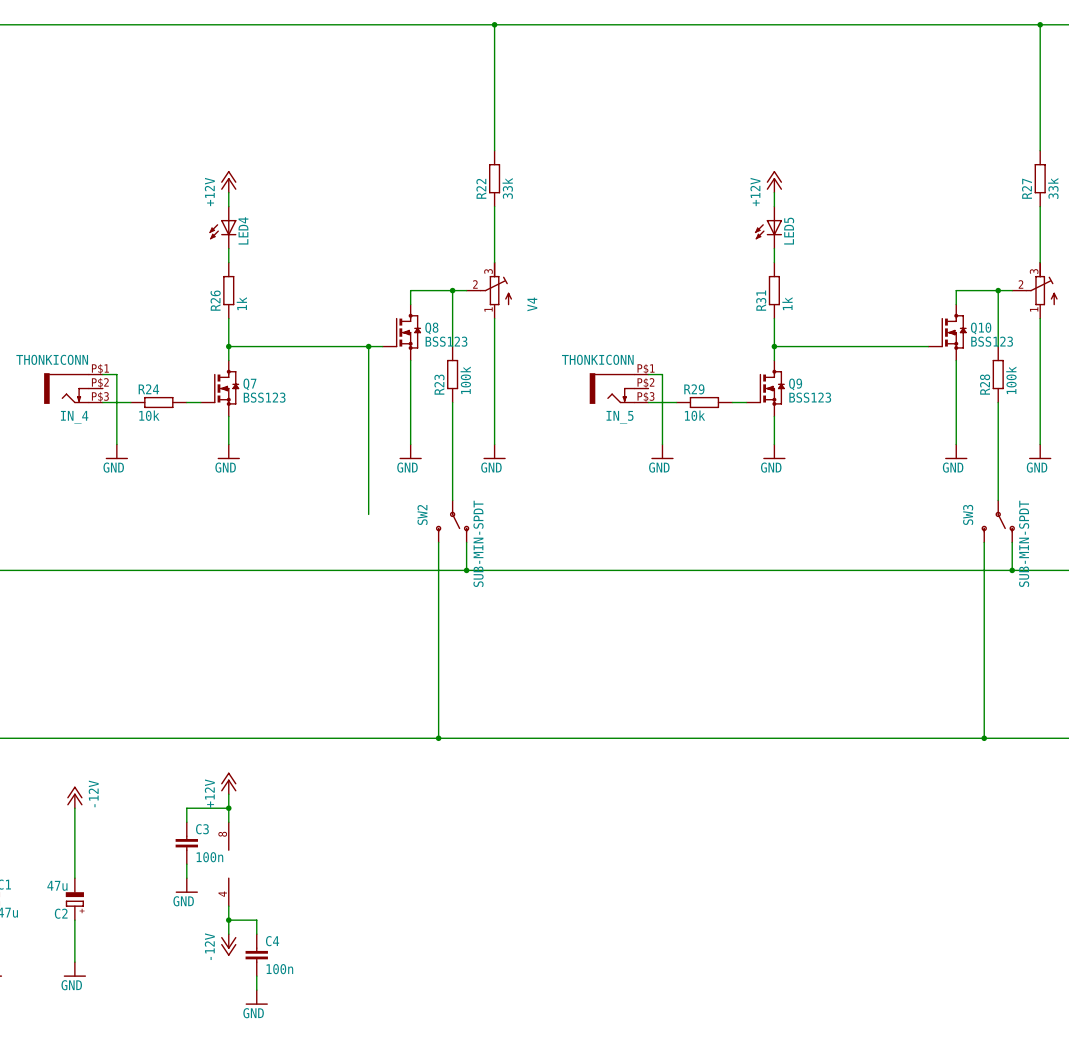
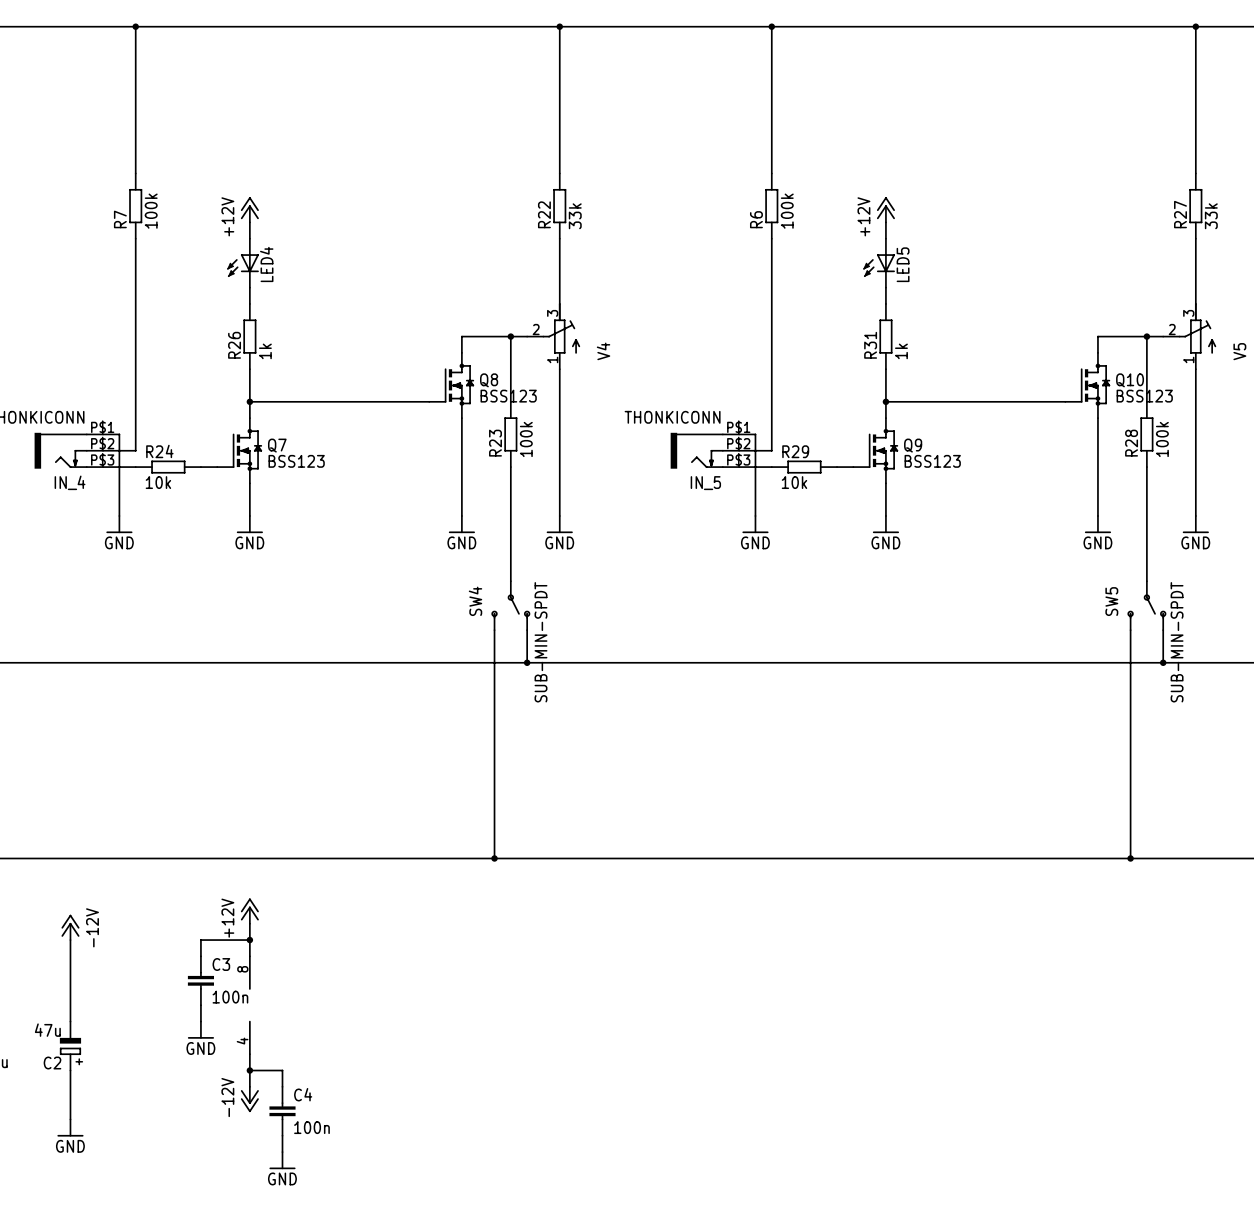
wire: none -> (135, 26) (135, 173)
junction: none -> (135, 26)
wire: none -> (771, 26) (771, 173)
junction: none -> (771, 26)
R7: none -> 100k (135, 206)
R6: none -> 100k (771, 206)
wire: none -> (135, 238) (135, 450) (103, 450)
wire: none -> (771, 238) (771, 450) (739, 450)
wire: (368, 346) (368, 514) -> none
junction: (368, 346) -> none
SW2 name: SW2 (422, 514) -> SW4 (475, 601)
SW3 name: SW3 (968, 514) -> SW5 (1111, 601)

